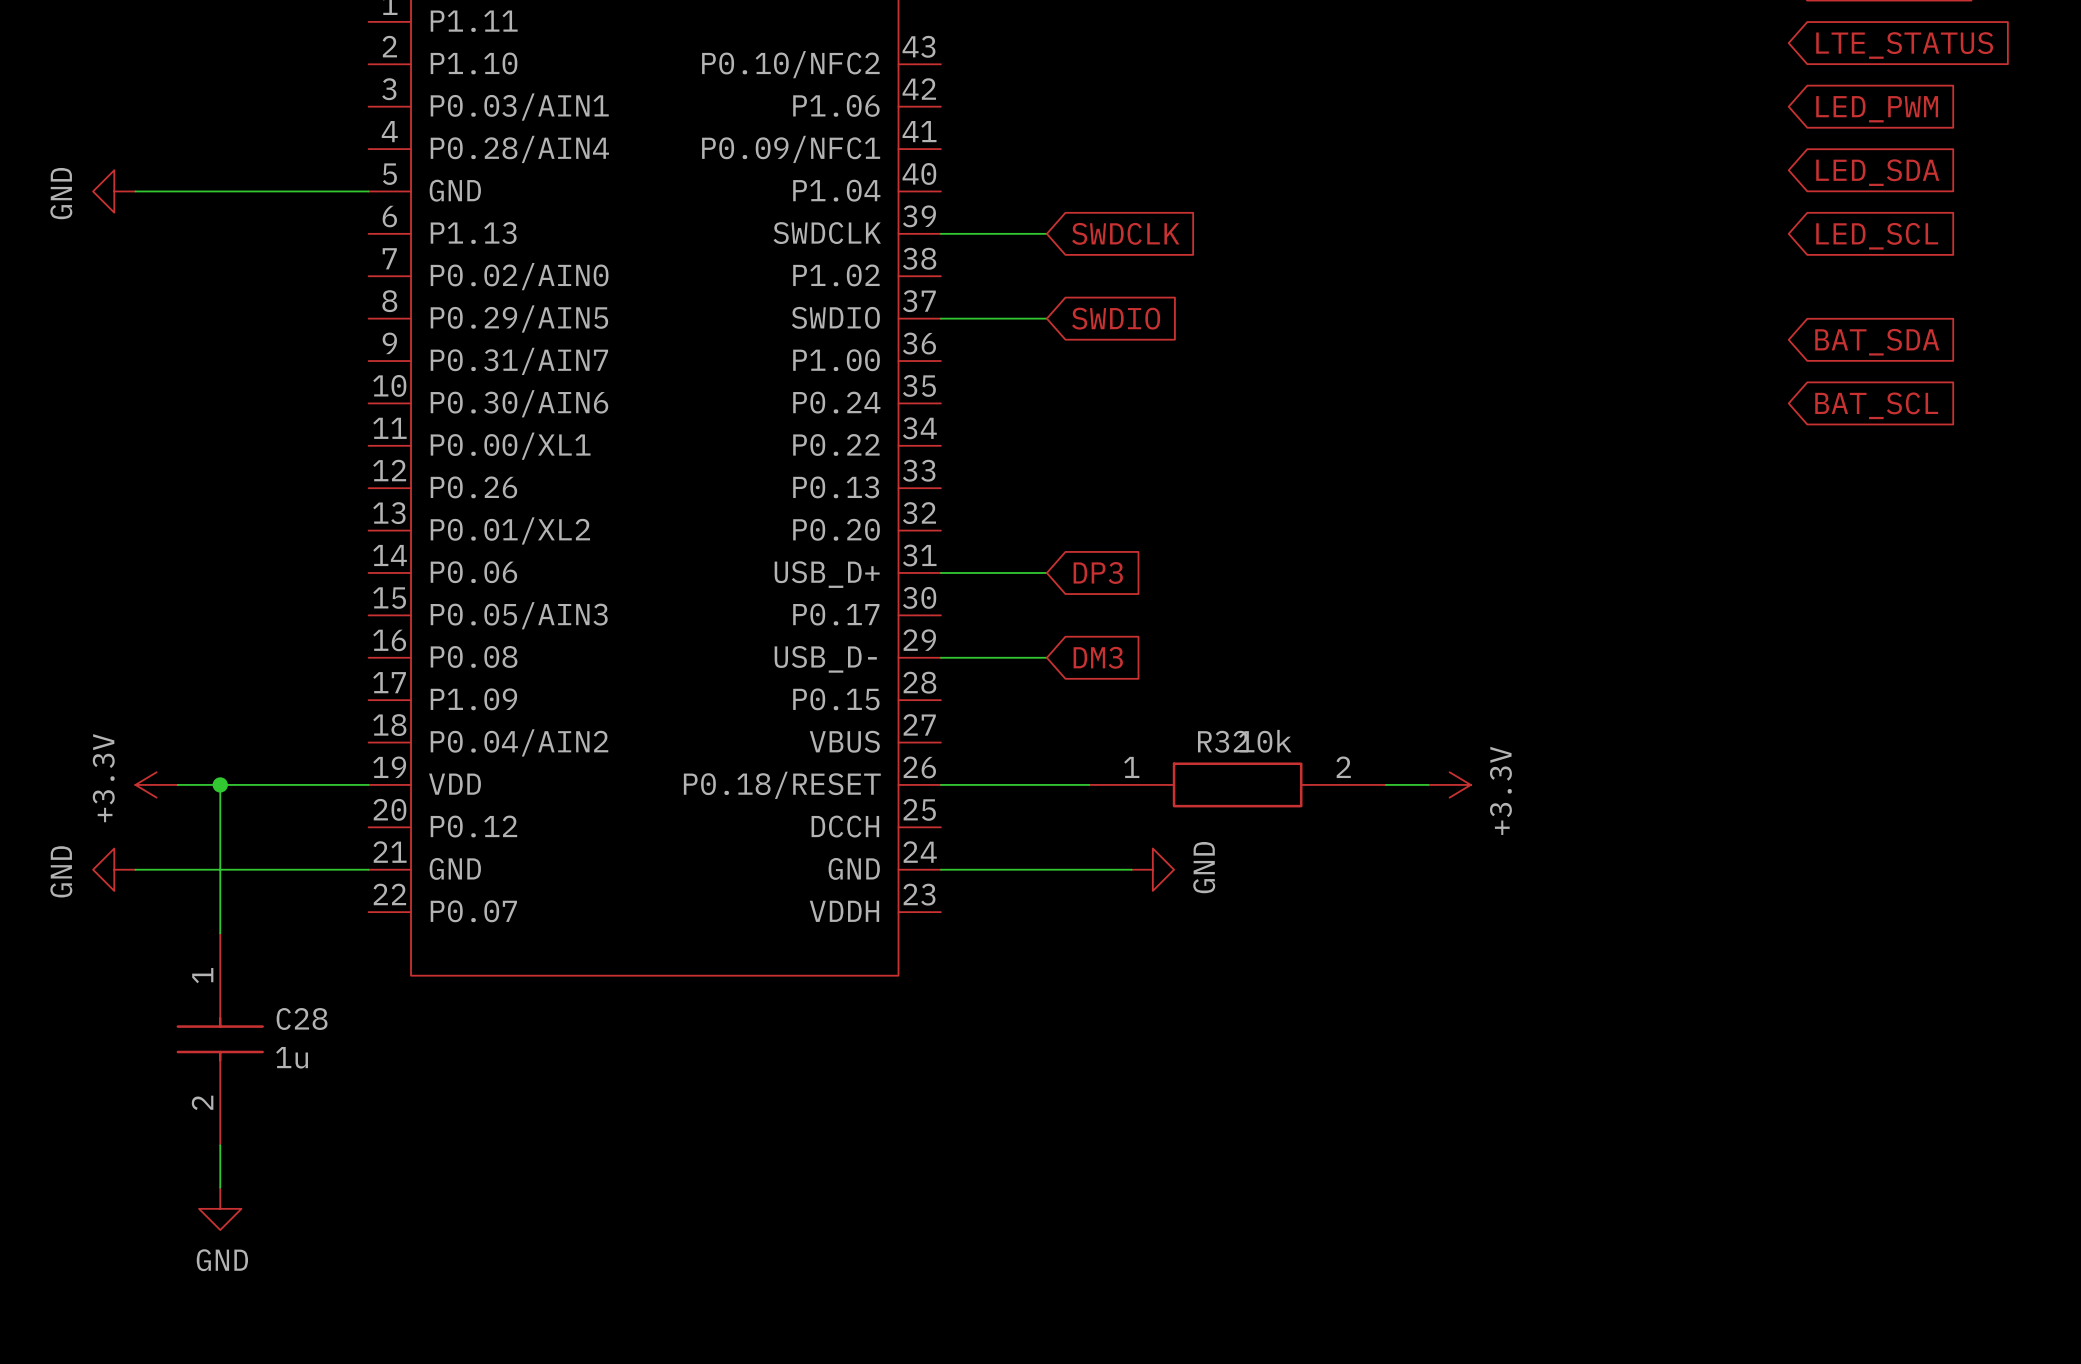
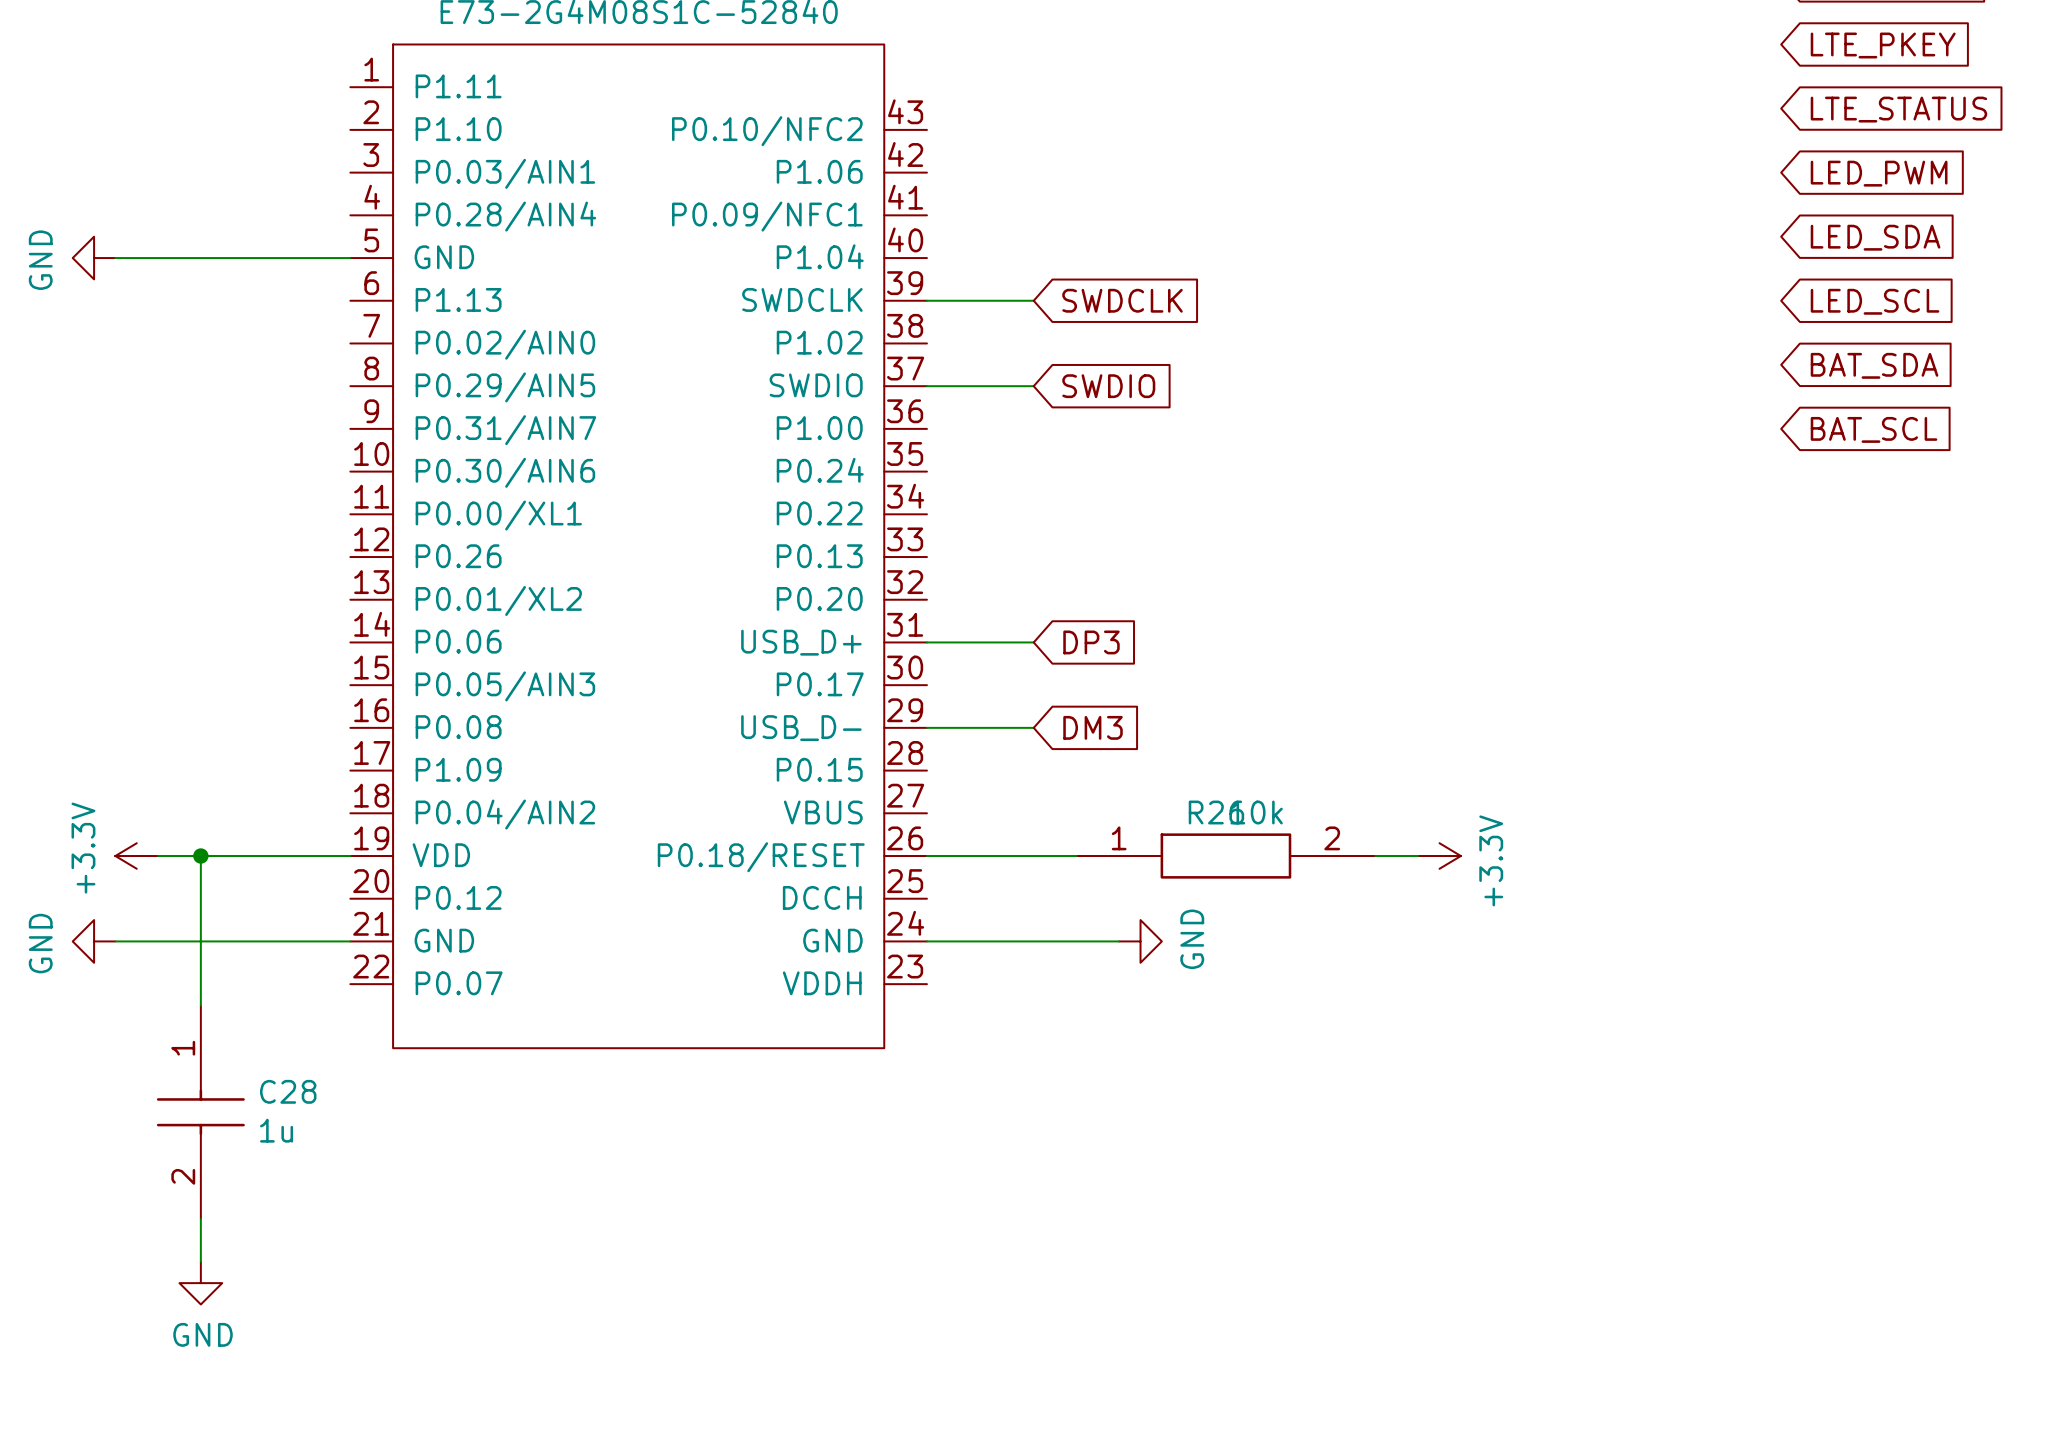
global label position: BAT_SDA (1877, 342) -> BAT_SDA (1874, 365)
global label position: BAT_SCL (1876, 405) -> BAT_SCL (1874, 429)
R32 name: R32 (1222, 741) -> R26 (1216, 812)

